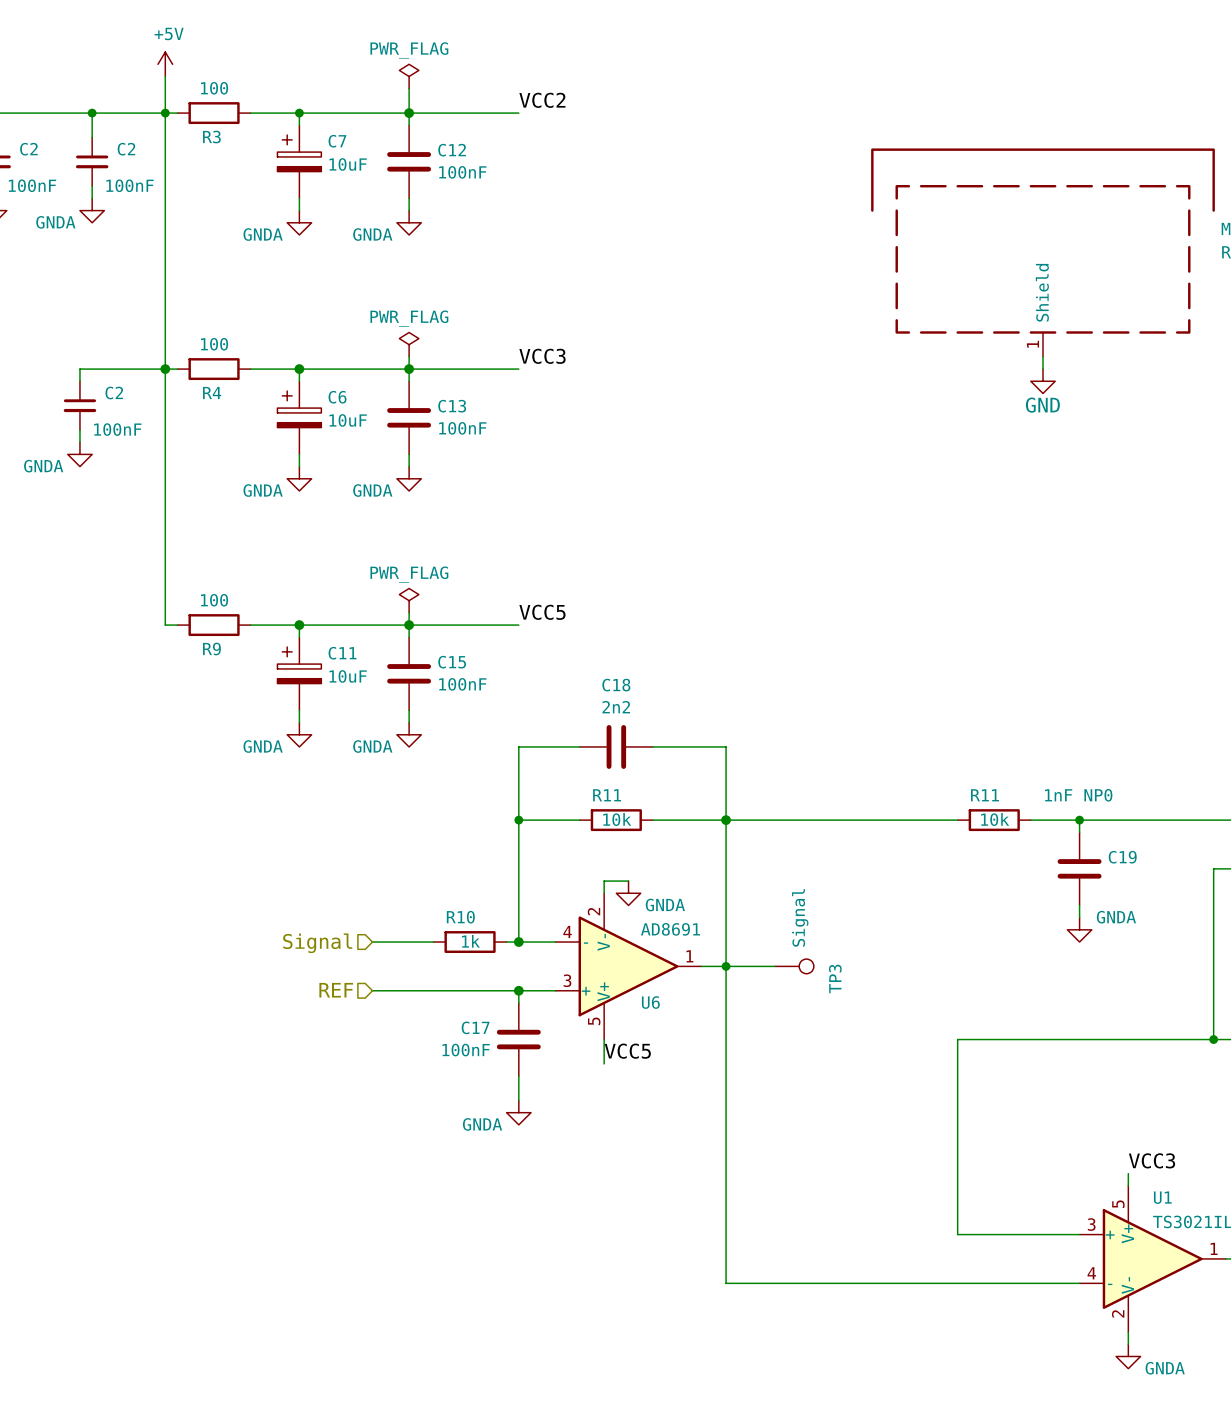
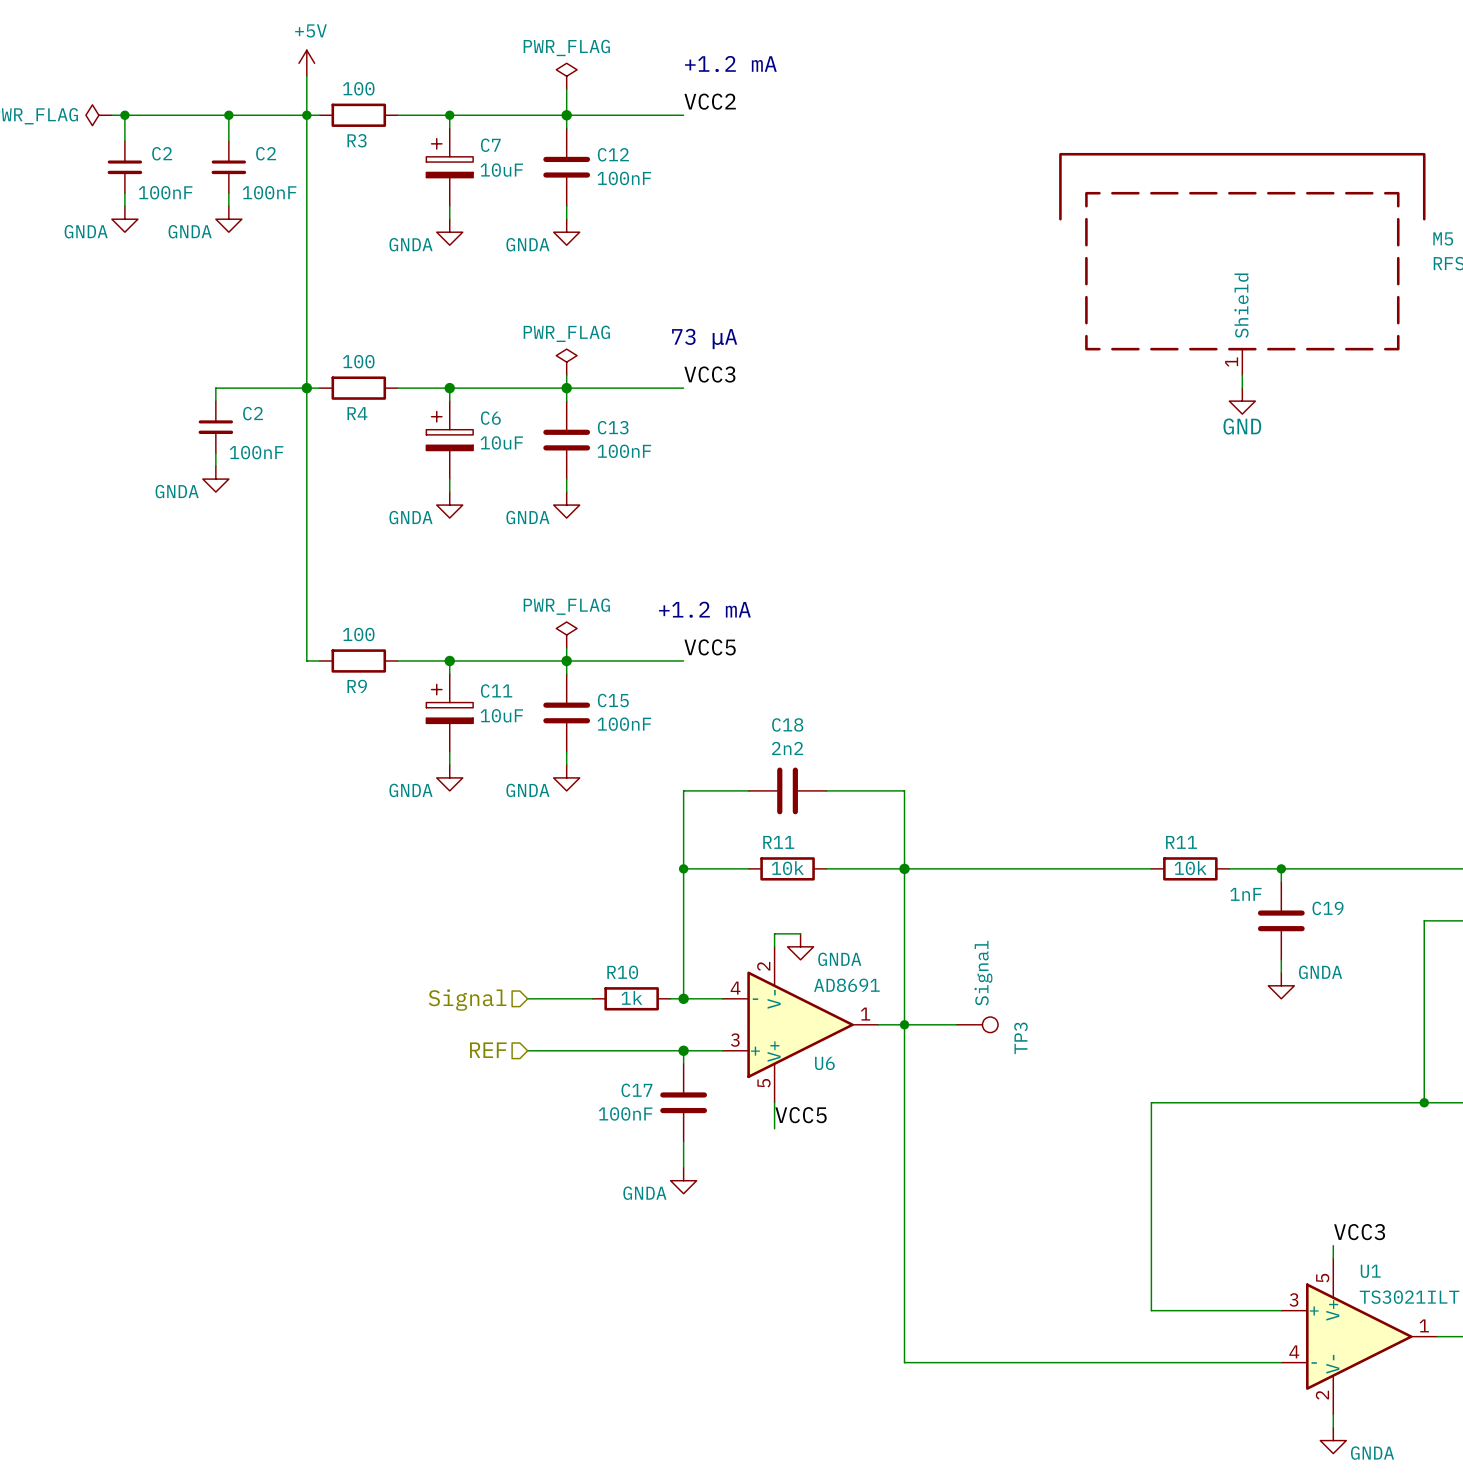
text: none -> +1.2 mA (730, 63)
text: none -> 73 μA (704, 338)
text: none -> +1.2 mA (704, 609)
C19 value: 1nF NP0 (1078, 795) -> 1nF (1245, 894)

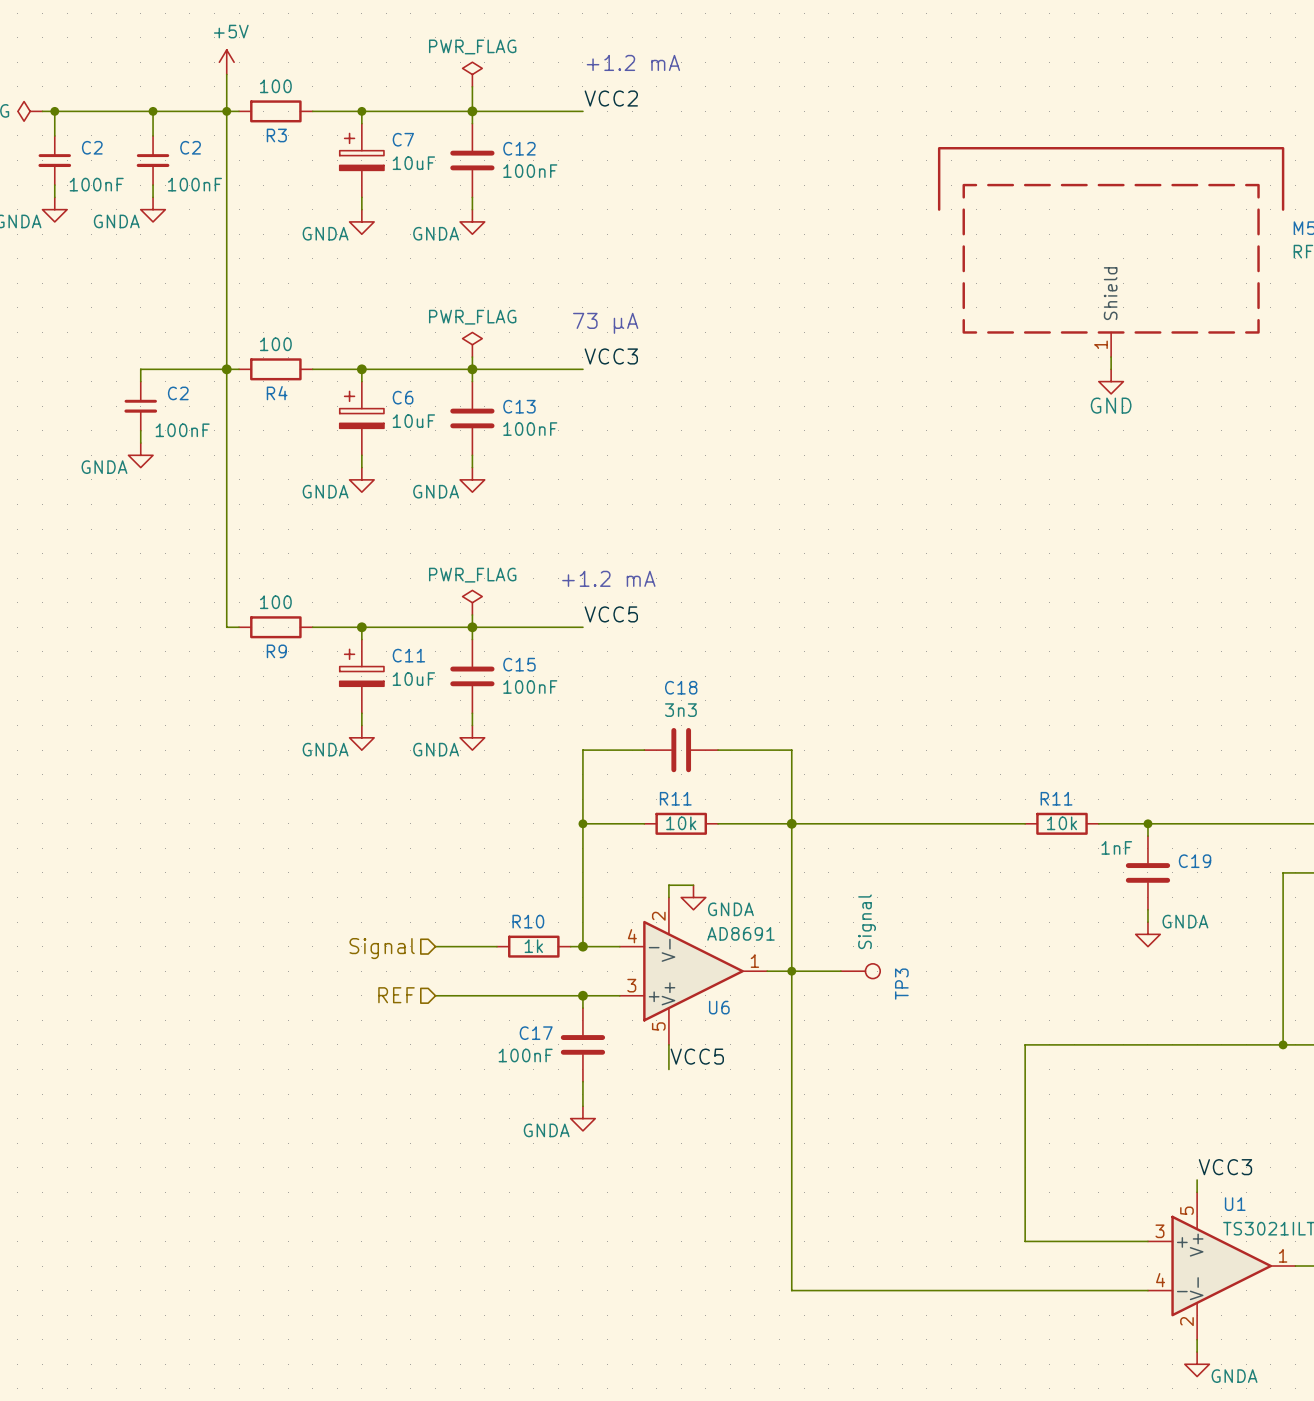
C18 value: 2n2 (787, 748) -> 3n3 (680, 710)

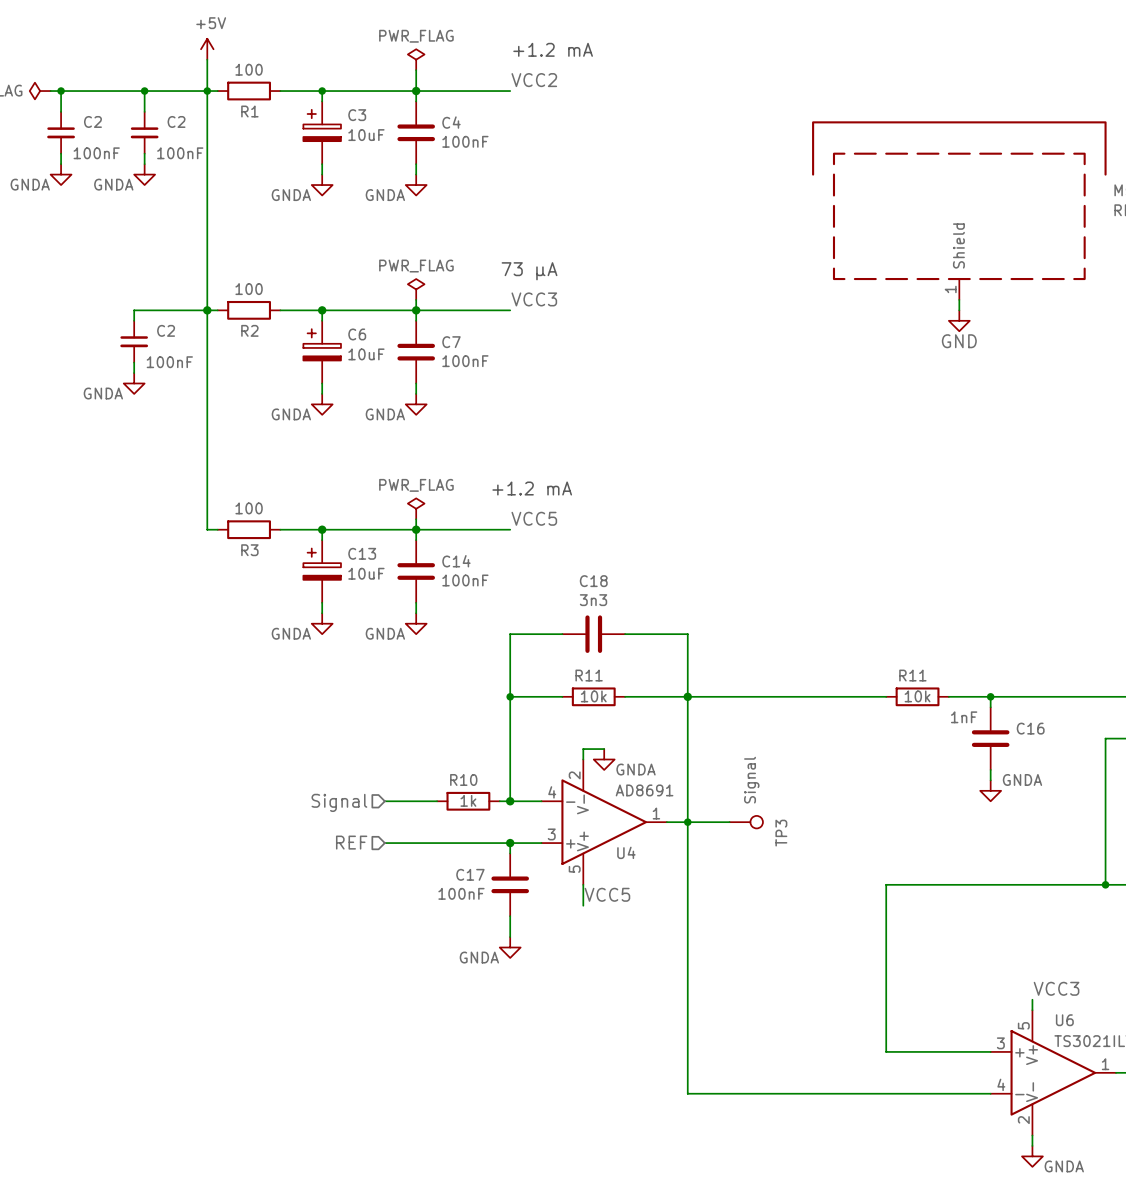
R3 name: R3 (276, 135) -> R1 (249, 111)
C7 name: C7 (403, 139) -> C3 (357, 115)
C12 name: C12 (519, 148) -> C4 (451, 122)
R4 name: R4 (277, 393) -> R2 (249, 330)
C13 name: C13 (519, 406) -> C7 (451, 342)
R9 name: R9 (276, 651) -> R3 (249, 550)
C11 name: C11 (408, 655) -> C13 (362, 553)
C15 name: C15 (519, 664) -> C14 (456, 561)
C19 name: C19 (1195, 861) -> C16 (1030, 728)
U6 name: U6 (719, 1007) -> U4 (626, 852)
U1 name: U1 (1235, 1204) -> U6 (1064, 1020)

